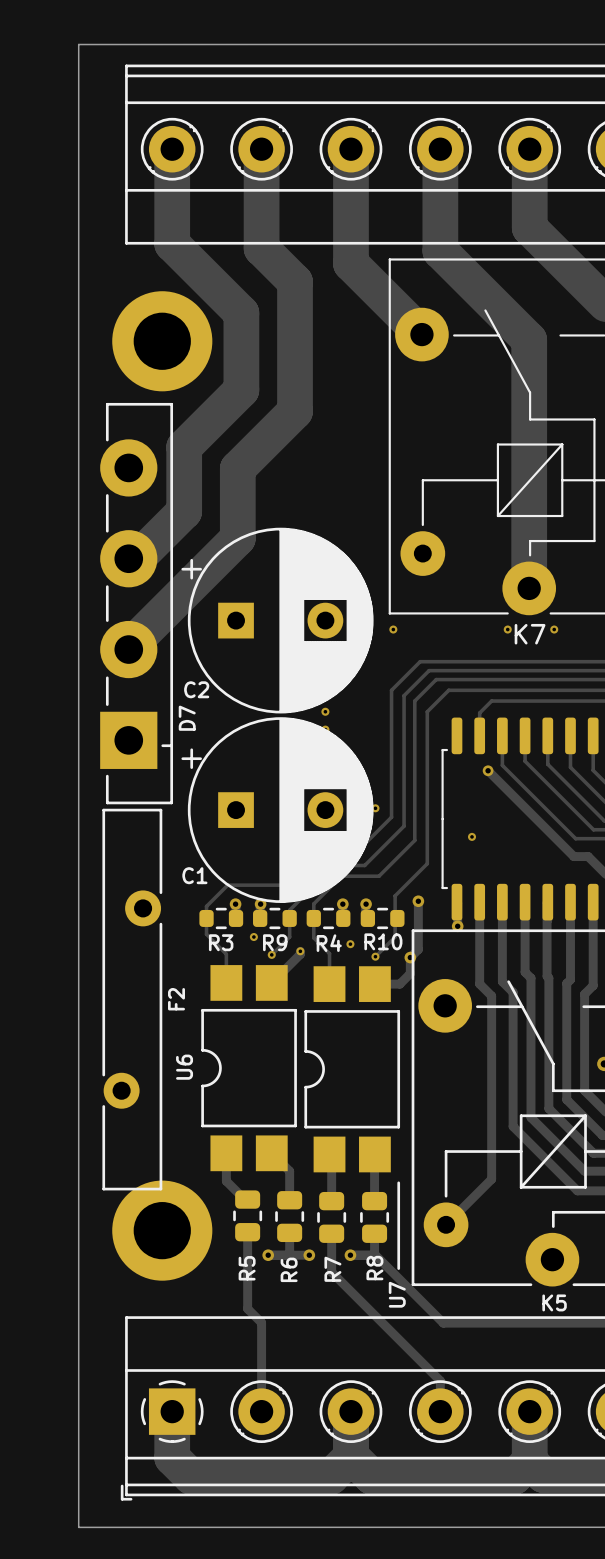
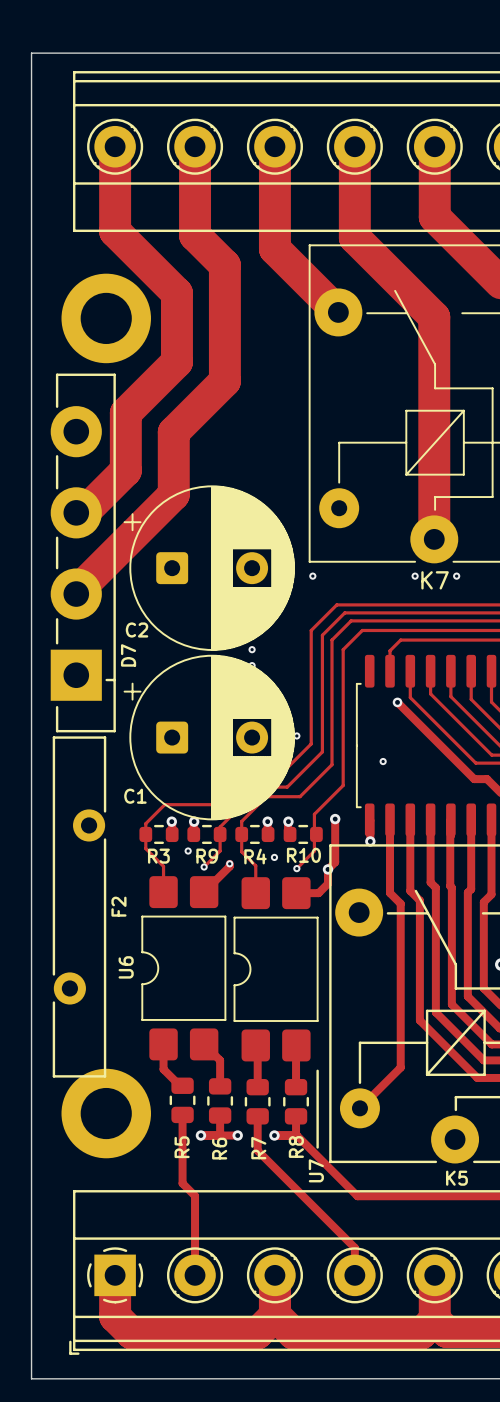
C2 footprint: [181, 527, 374, 714] -> [123, 485, 295, 651]
C1 footprint: [181, 717, 374, 903] -> [123, 654, 295, 821]
U6 footprint: [201, 965, 297, 1172] -> [141, 876, 227, 1061]
U7 footprint: [304, 966, 401, 1173] -> [233, 877, 319, 1062]

